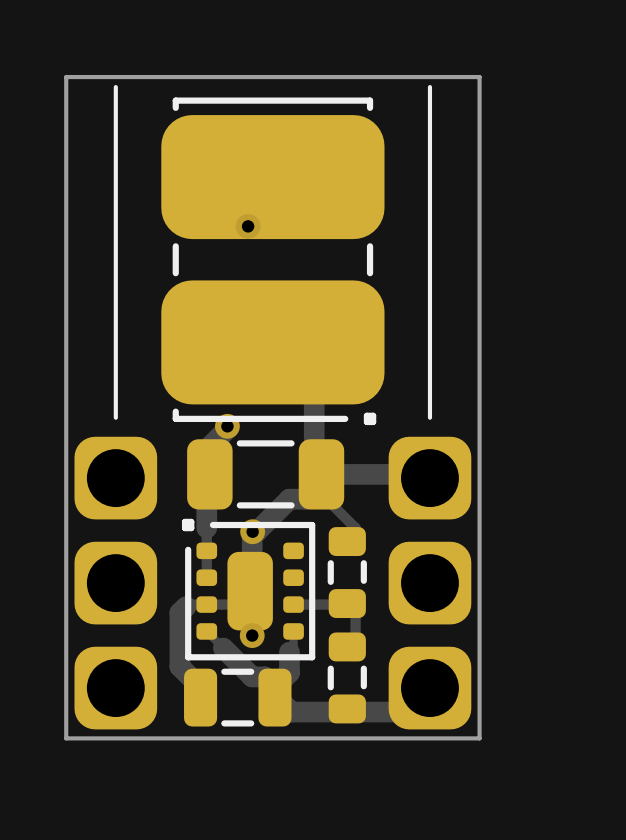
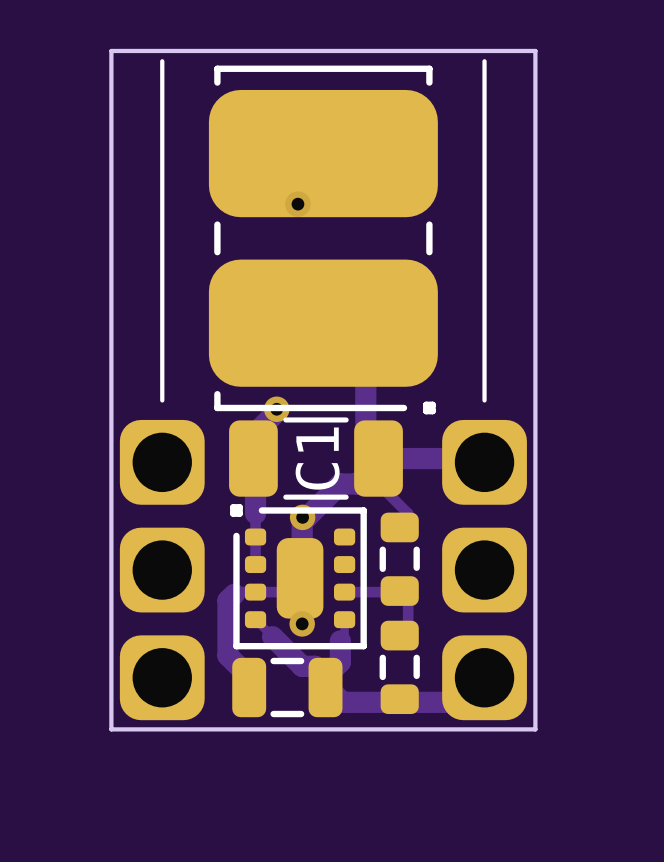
part footprint: [161, 97, 385, 426] -> [208, 65, 438, 415]
part: (265, 474) -> none
C1: none -> (315, 458)

